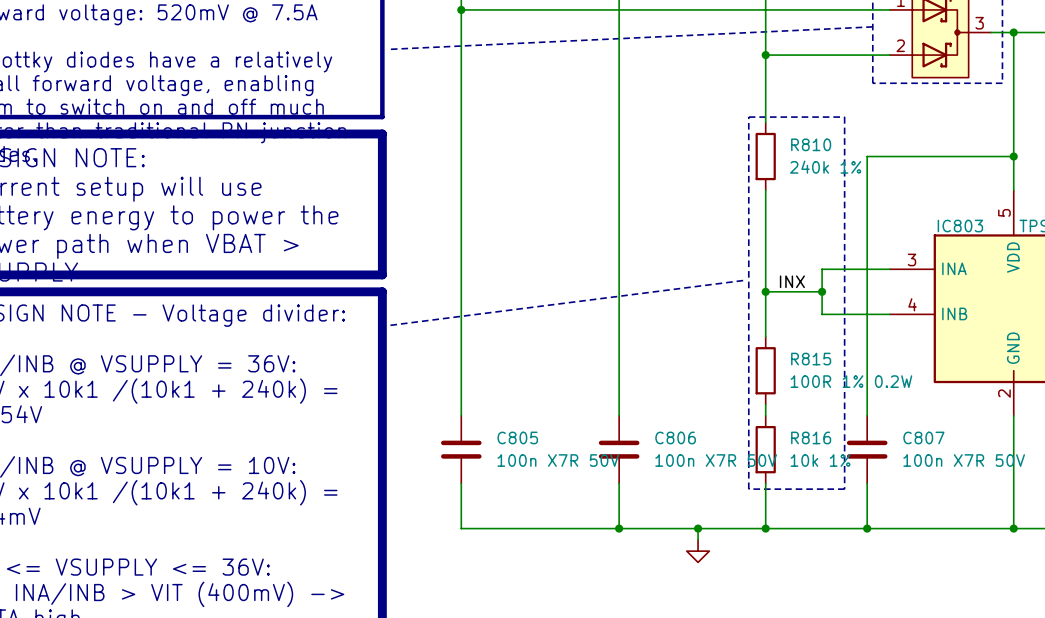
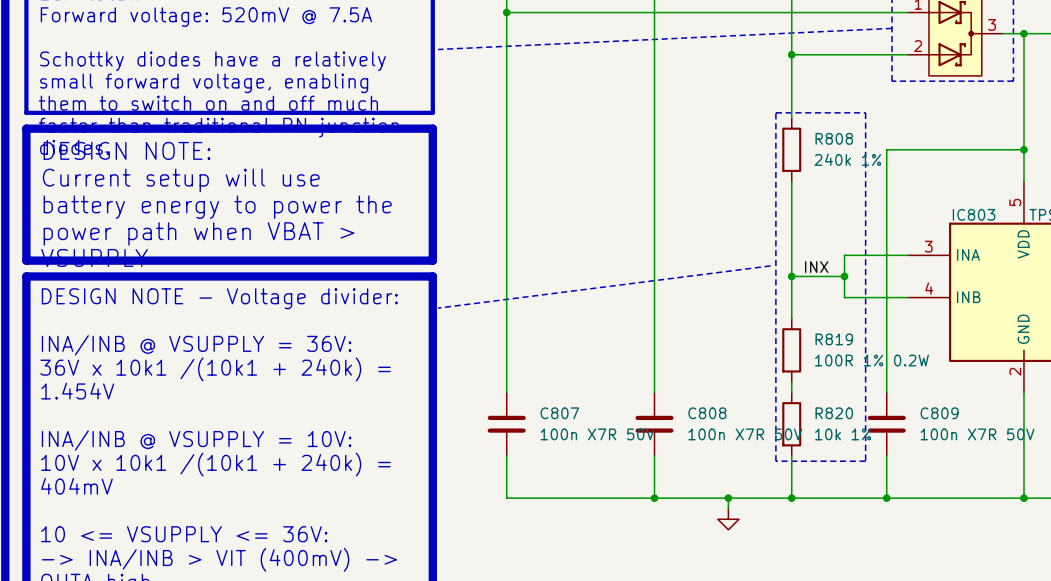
R810 name: R810 (811, 144) -> R808 (834, 138)
R815 name: R815 (811, 359) -> R819 (834, 339)
C805 name: C805 (517, 437) -> C807 (559, 413)
C806 name: C806 (675, 437) -> C808 (707, 413)
R816 name: R816 (811, 437) -> R820 (834, 413)
C807 name: C807 (923, 437) -> C809 (939, 413)

